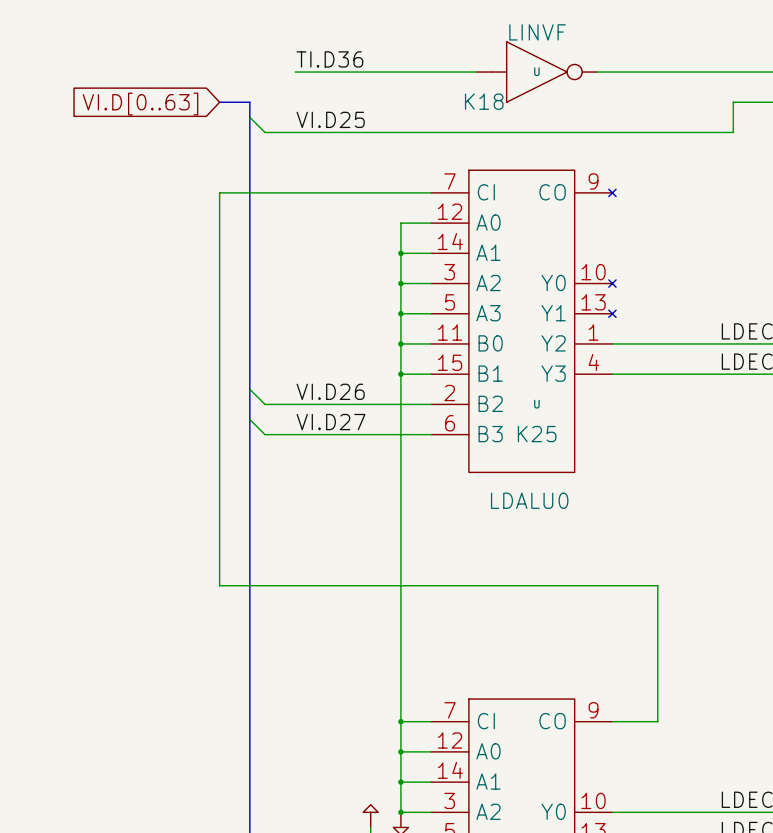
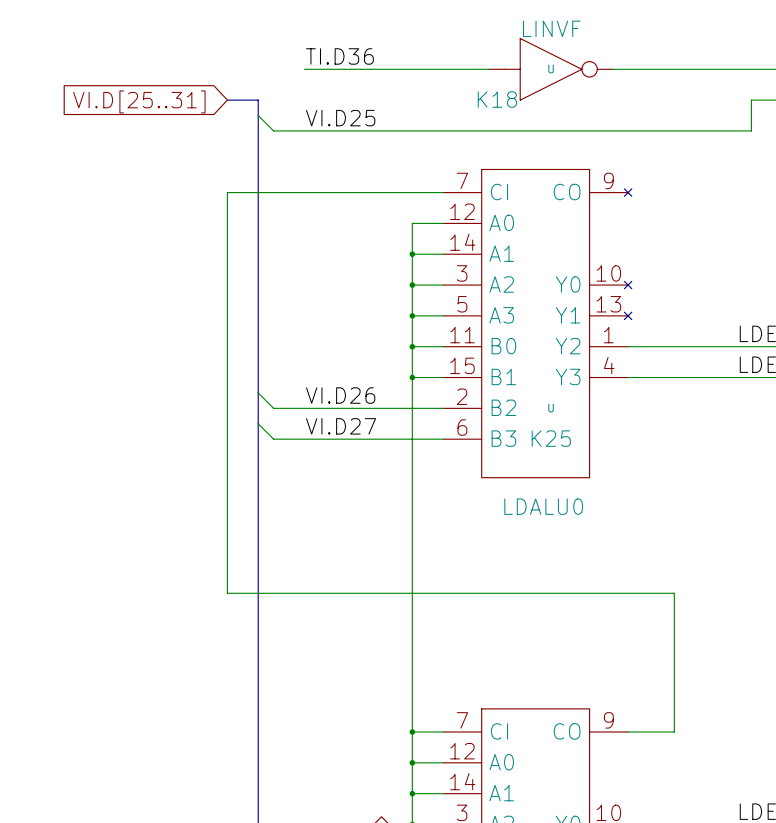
global label: VI.D[0..63] (140, 104) -> VI.D[25..31] (139, 101)

